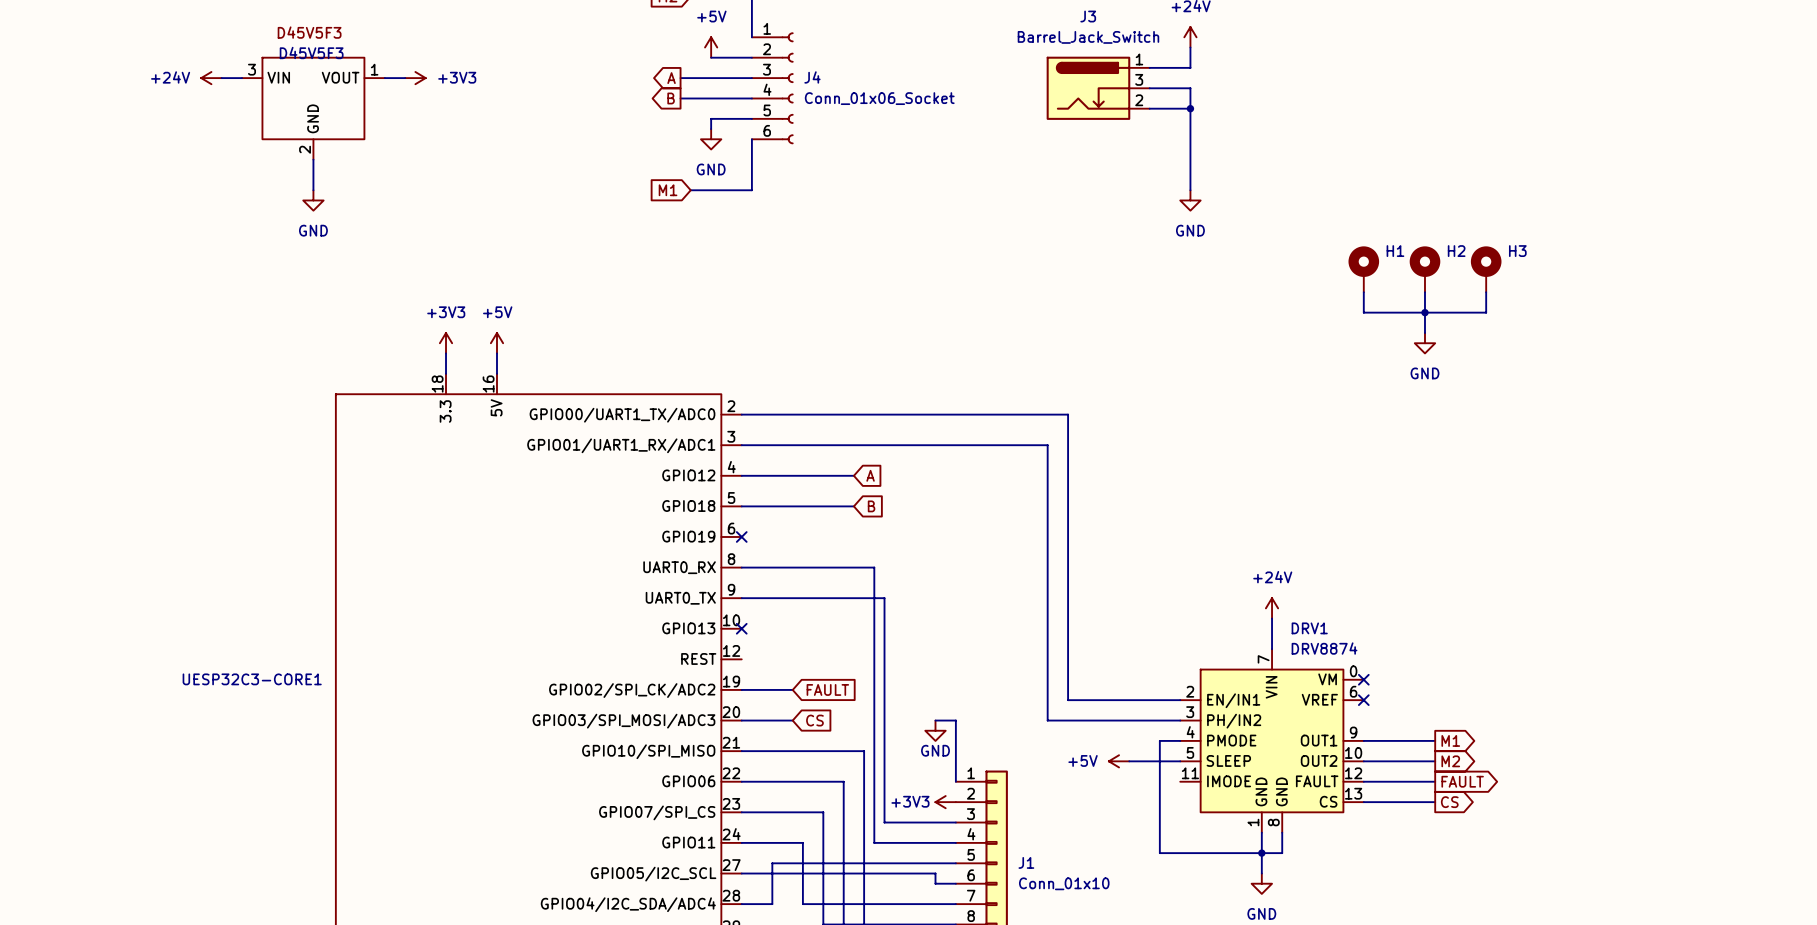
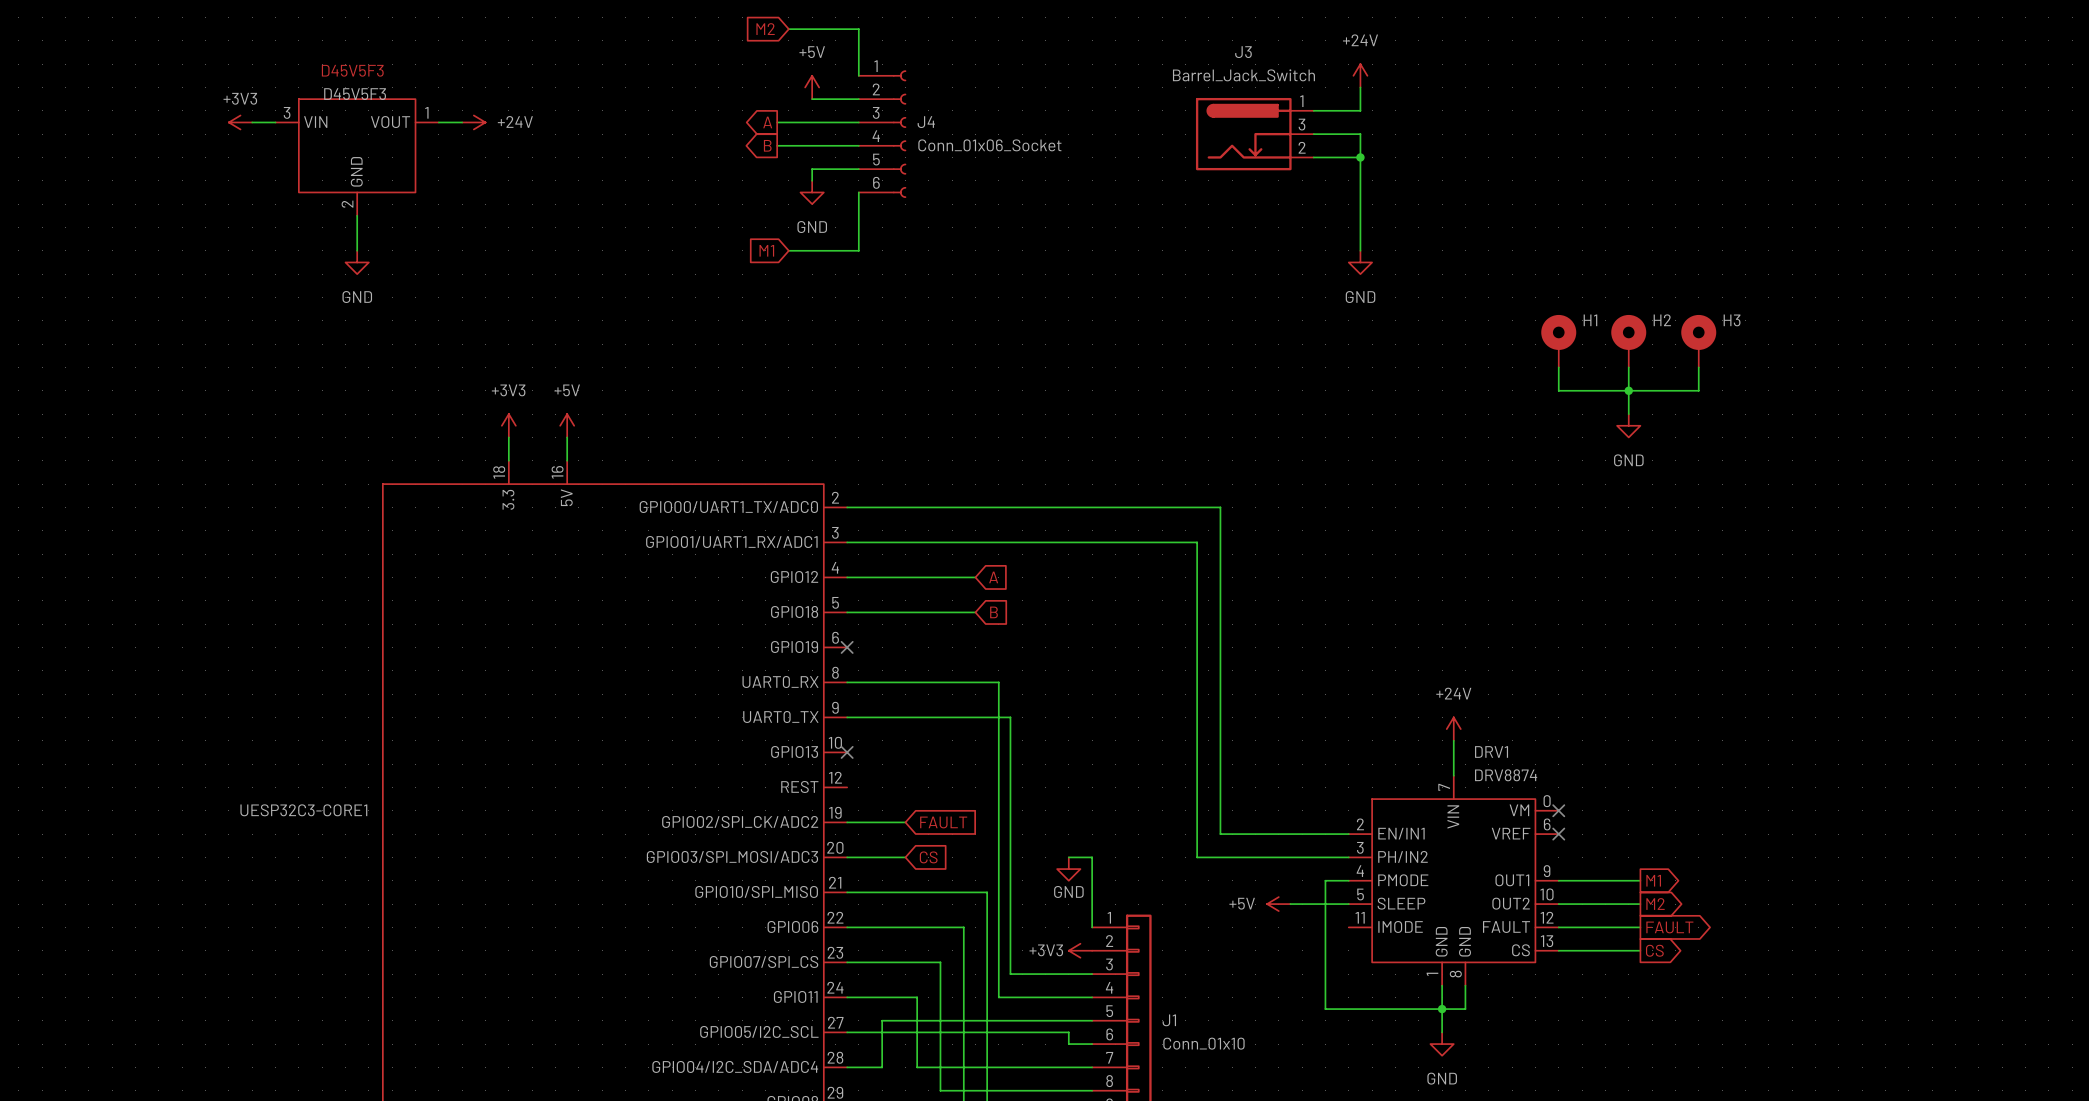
power symbol: +24V (211, 78) -> +3V3 (240, 122)
power symbol: +3V3 (415, 78) -> +24V (473, 122)

